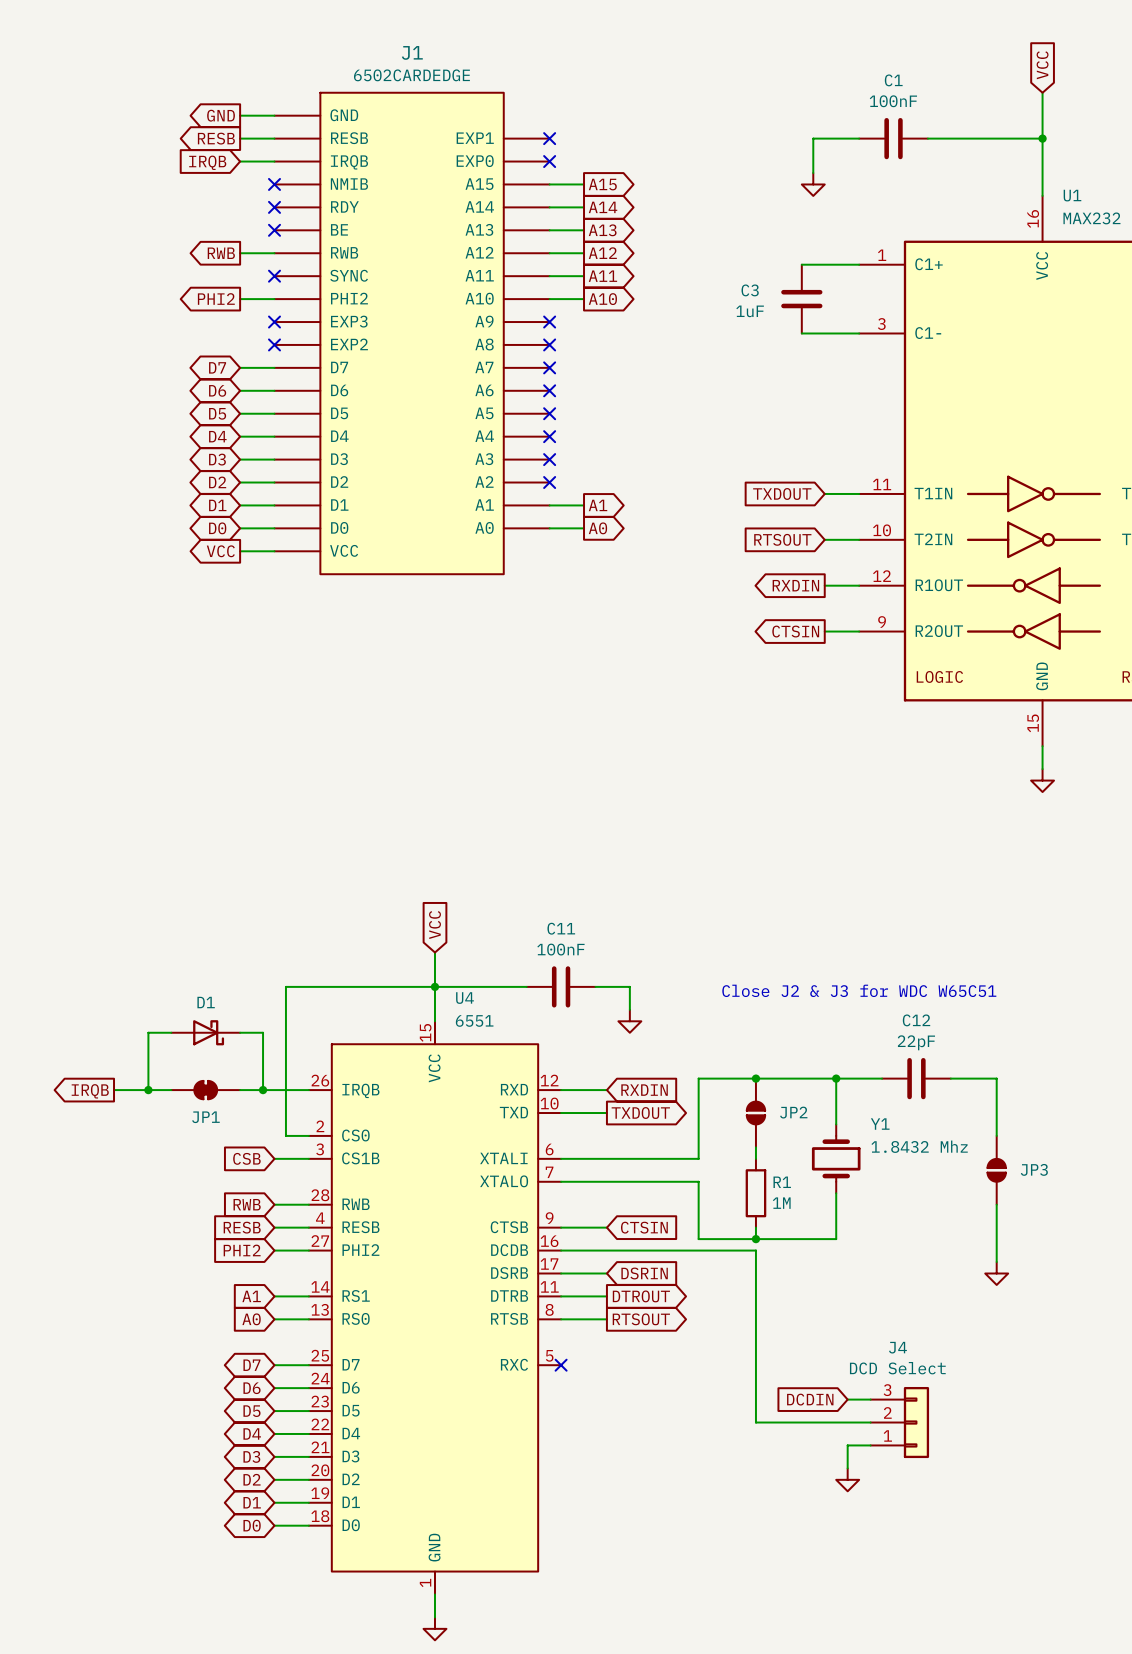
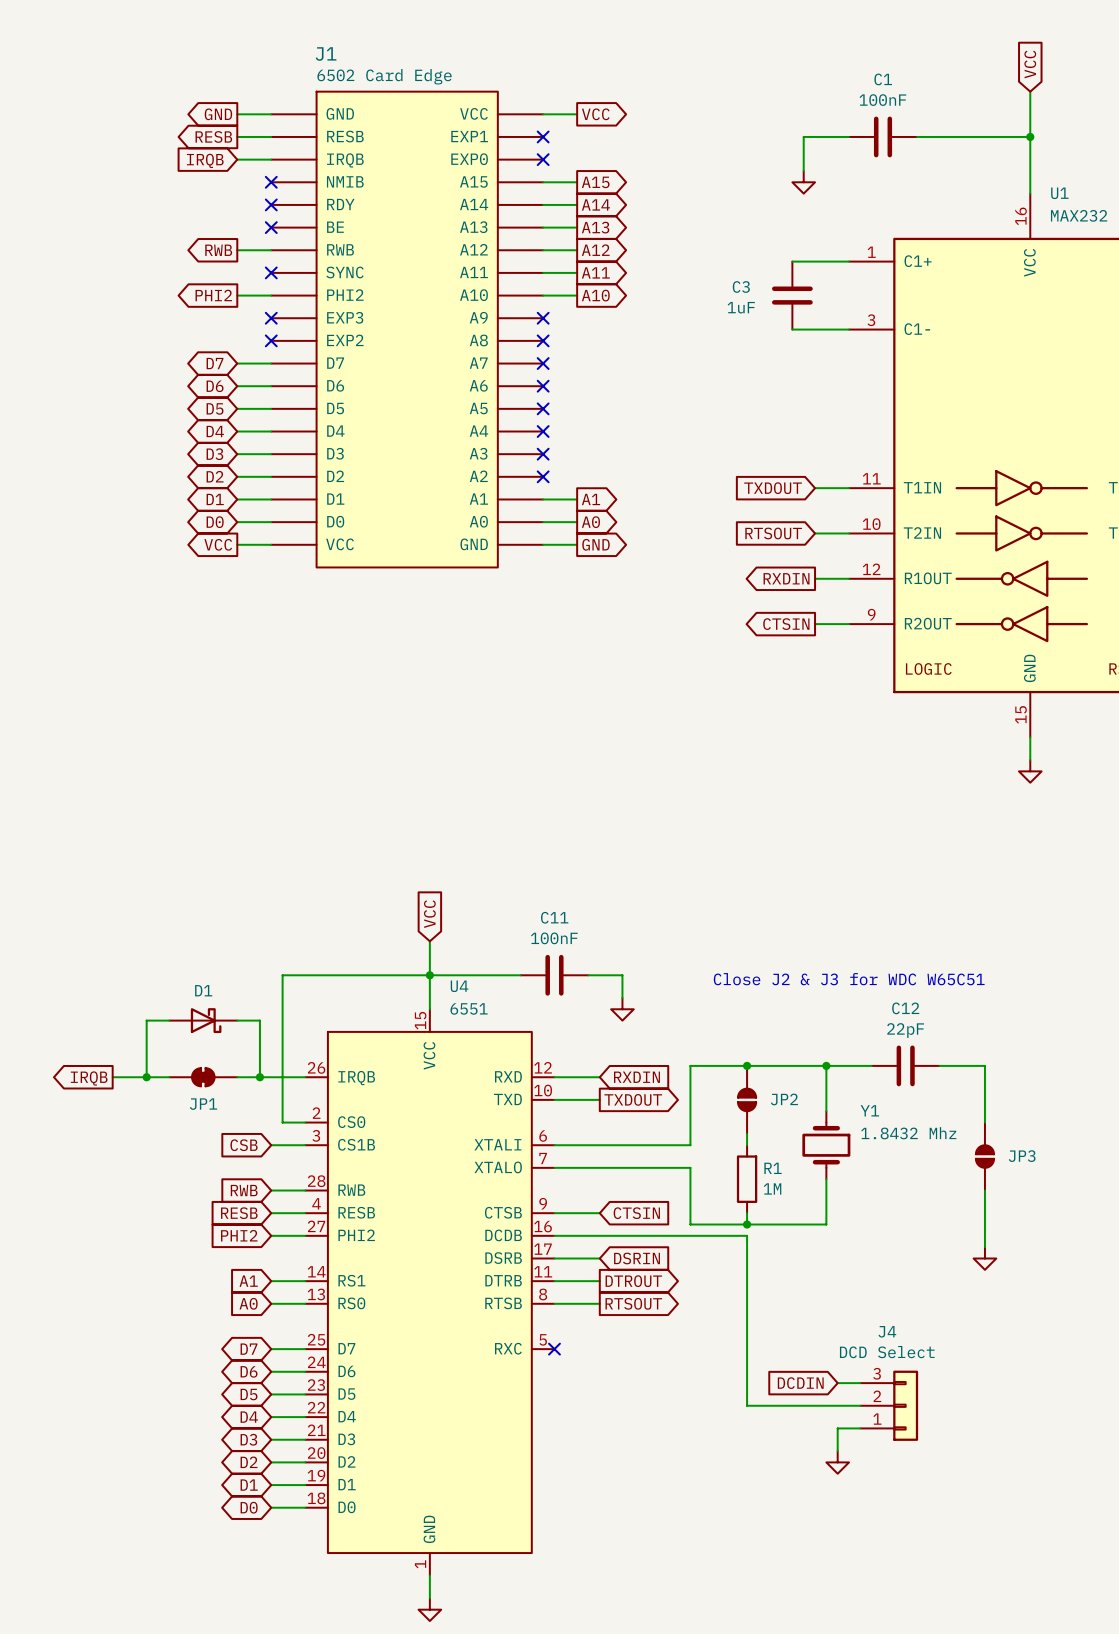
J1 name position: J1 (412, 52) -> J1 (326, 54)
J1 value: 6502CARDEDGE (411, 75) -> 6502 Card Edge (384, 76)
J1 symbol: [274, 92, 550, 575] -> [271, 91, 544, 568]
wire: none -> (543, 114) (577, 114)
global label: none -> VCC (595, 114)
wire: none -> (543, 544) (577, 544)
global label: none -> GND (595, 544)

